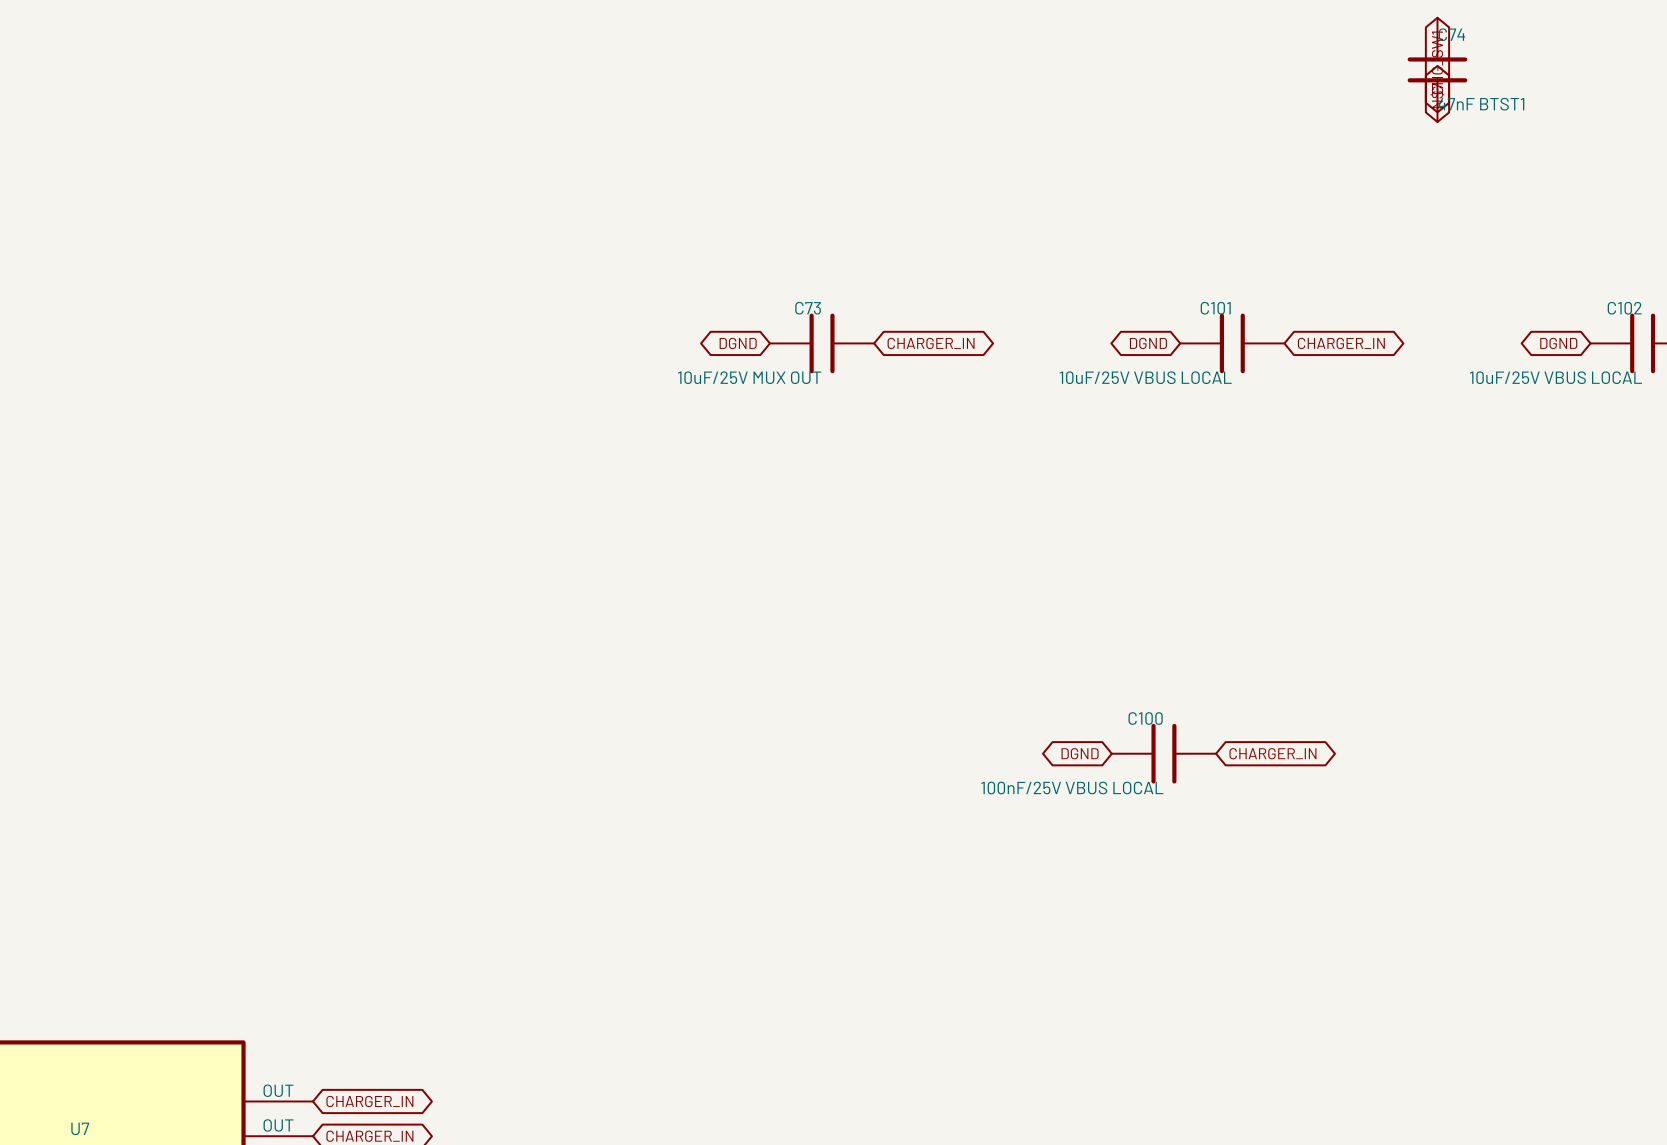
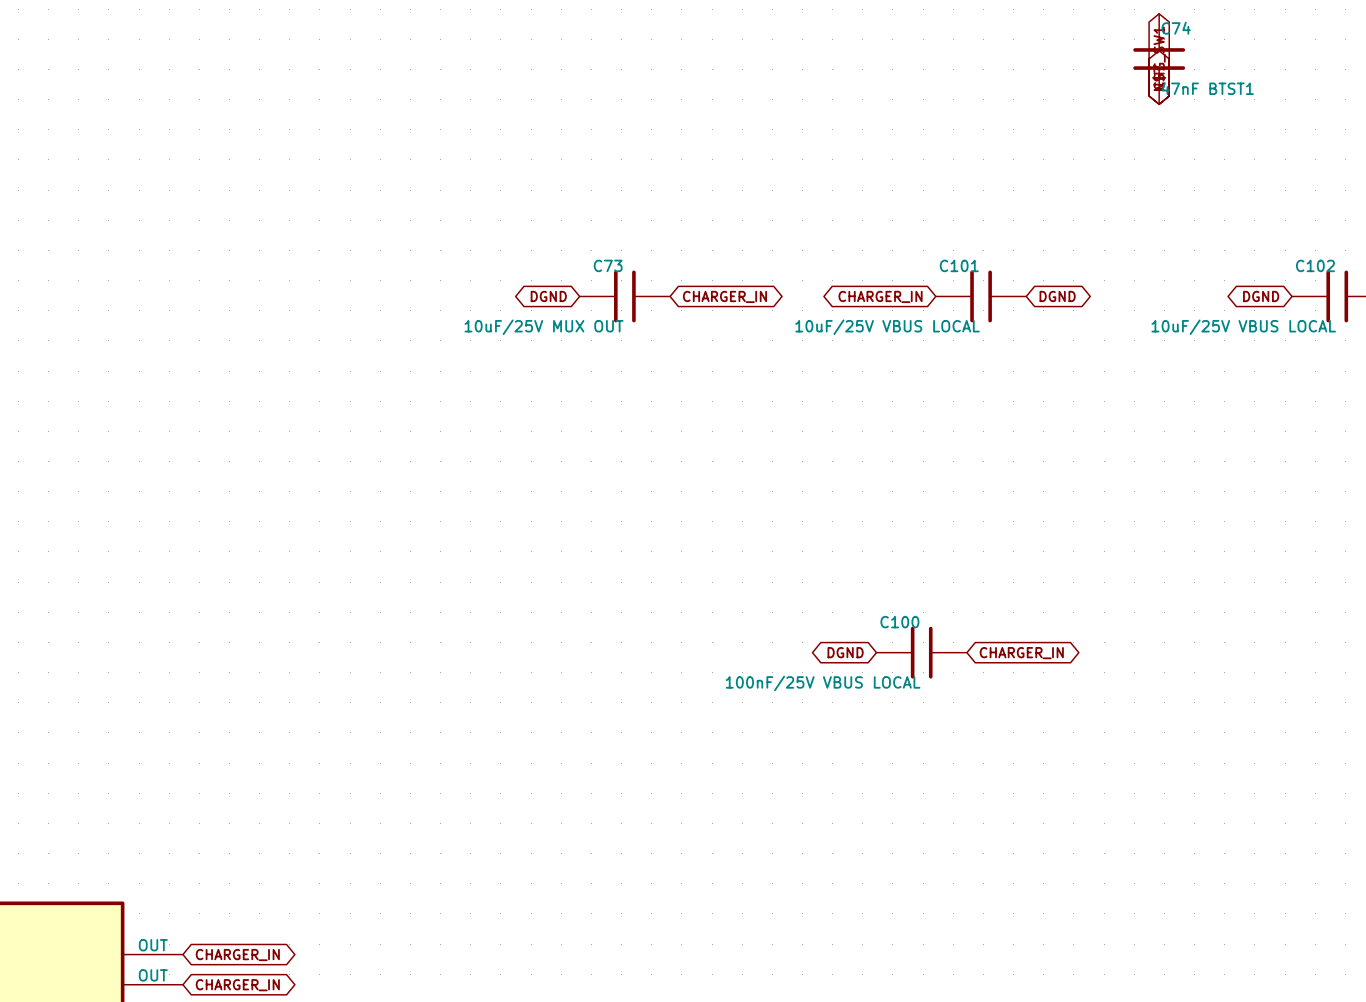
global label: DGND (1148, 343) -> CHARGER_IN (880, 296)
global label: CHARGER_IN (1341, 343) -> DGND (1057, 296)

